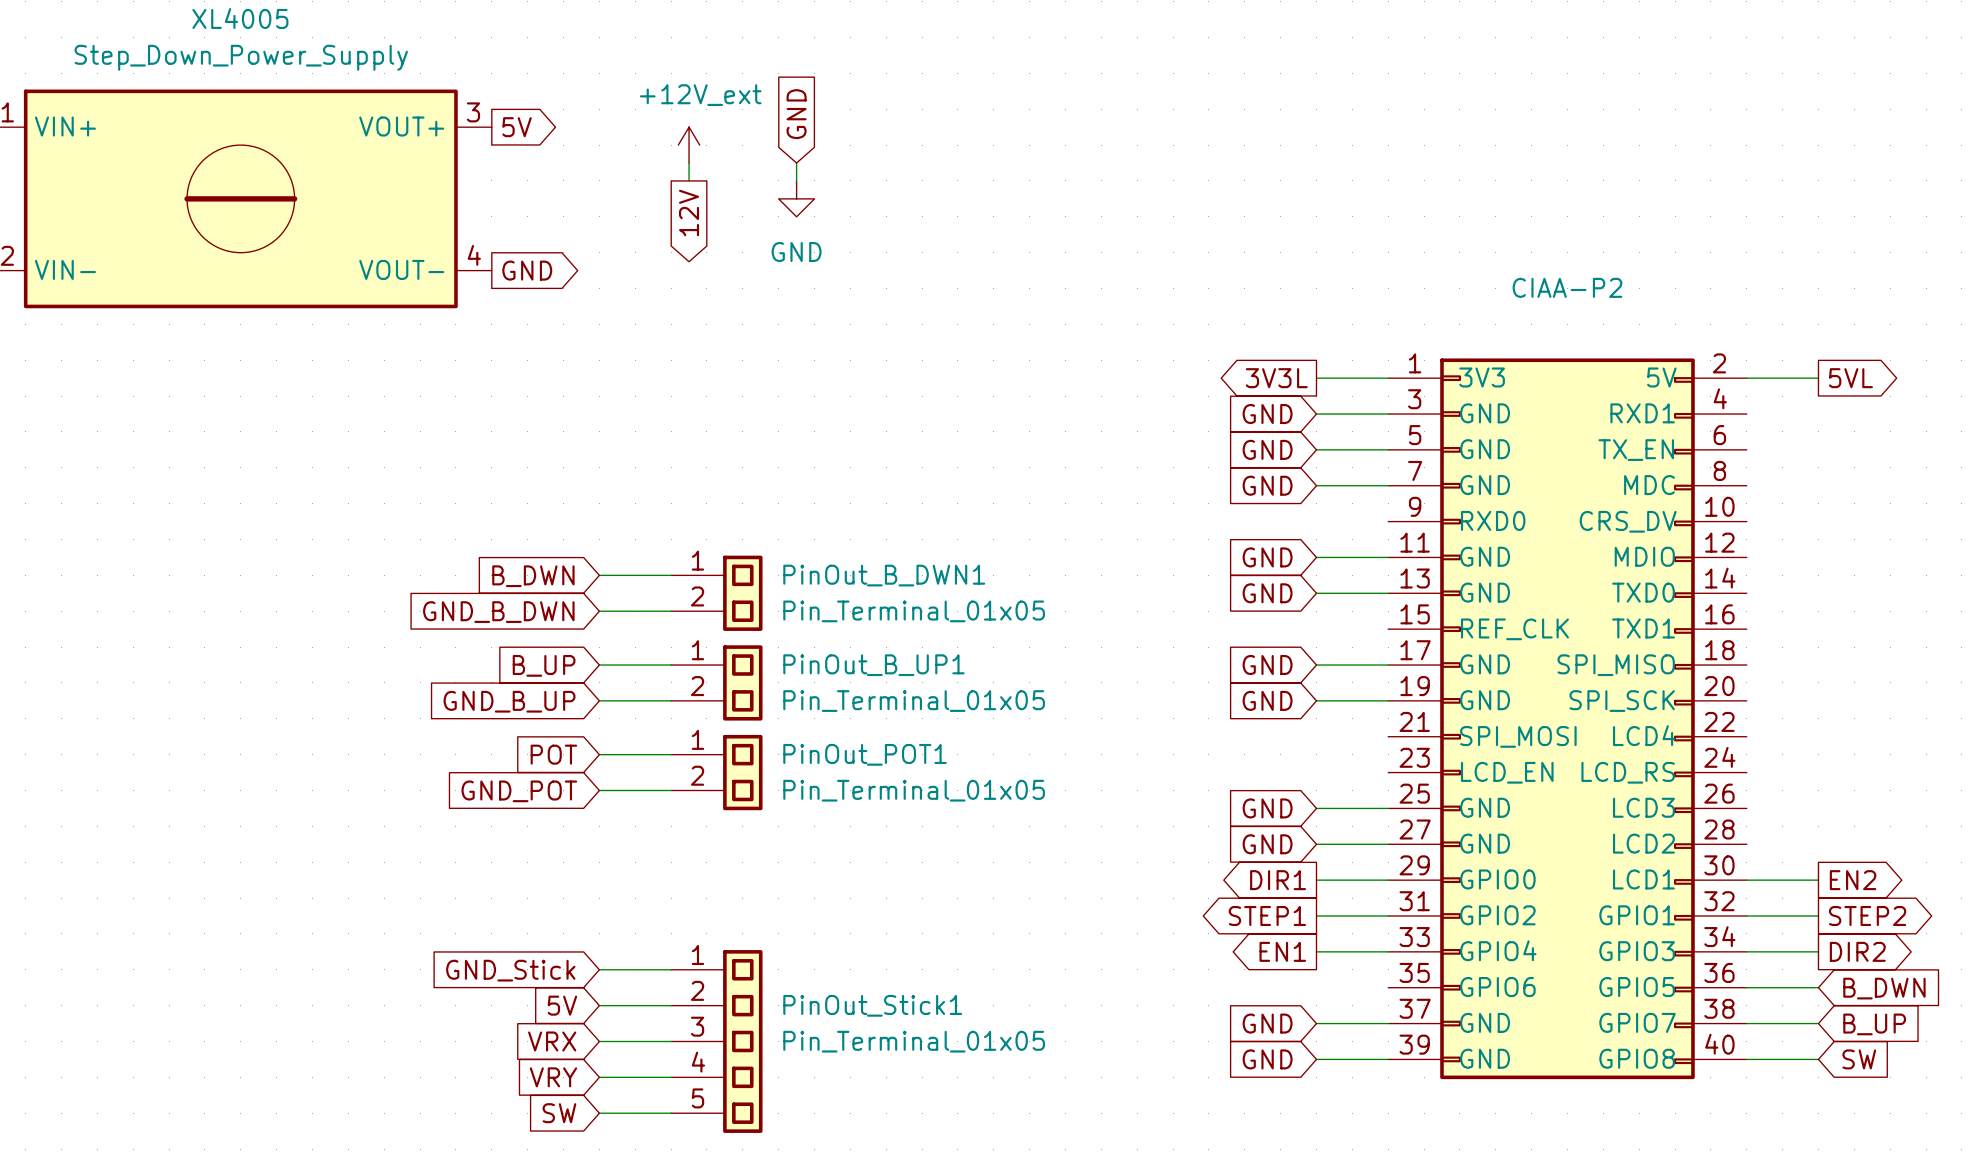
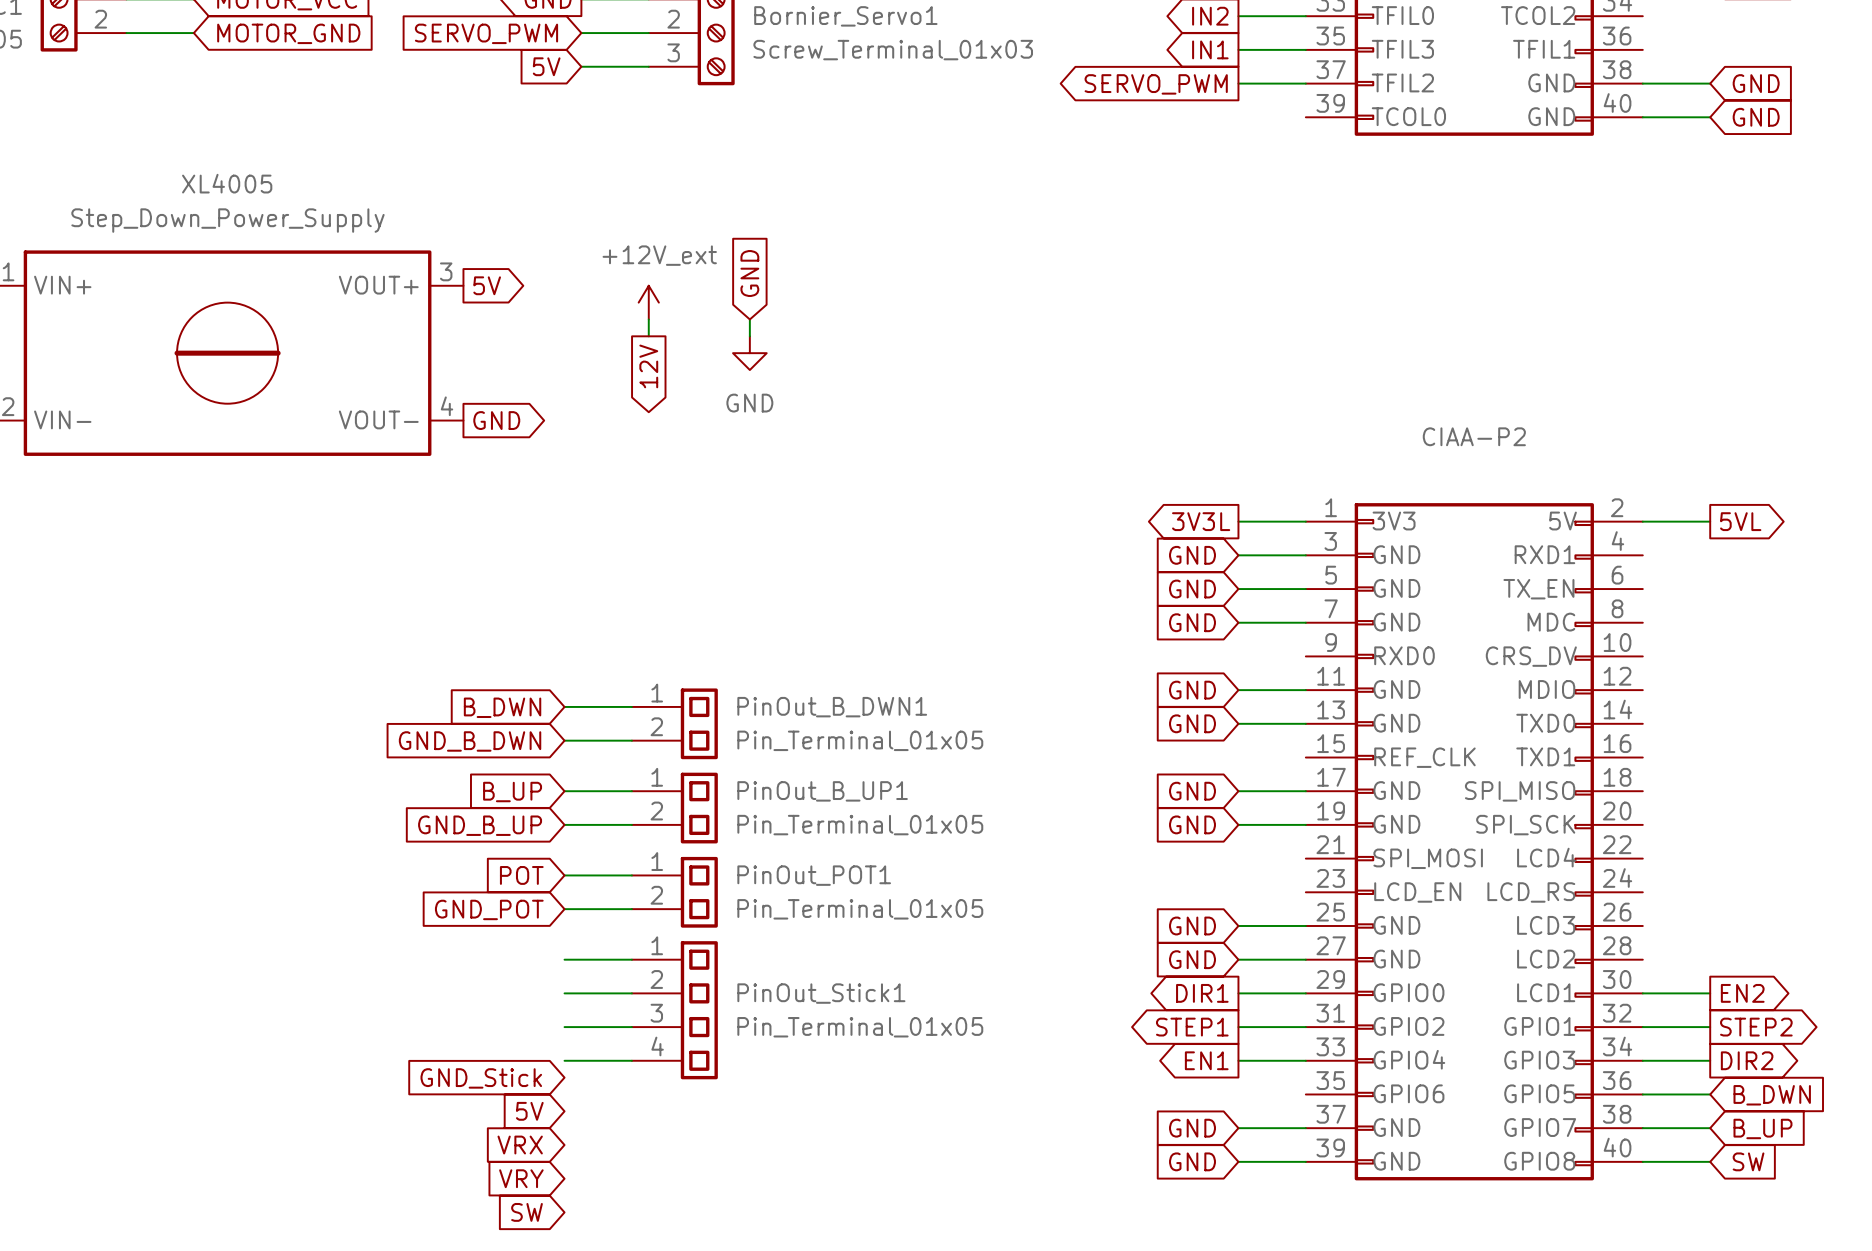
PinOut_Stick1 symbol: [671, 950, 763, 1133] -> [631, 941, 718, 1080]
wire: (599, 969) (671, 969) -> (564, 959) (631, 959)
wire: (599, 1005) (671, 1005) -> (564, 993) (631, 993)
wire: (599, 1041) (671, 1041) -> (564, 1027) (631, 1027)
wire: (599, 1077) (671, 1077) -> (564, 1060) (631, 1060)
wire: (599, 1113) (671, 1113) -> none

